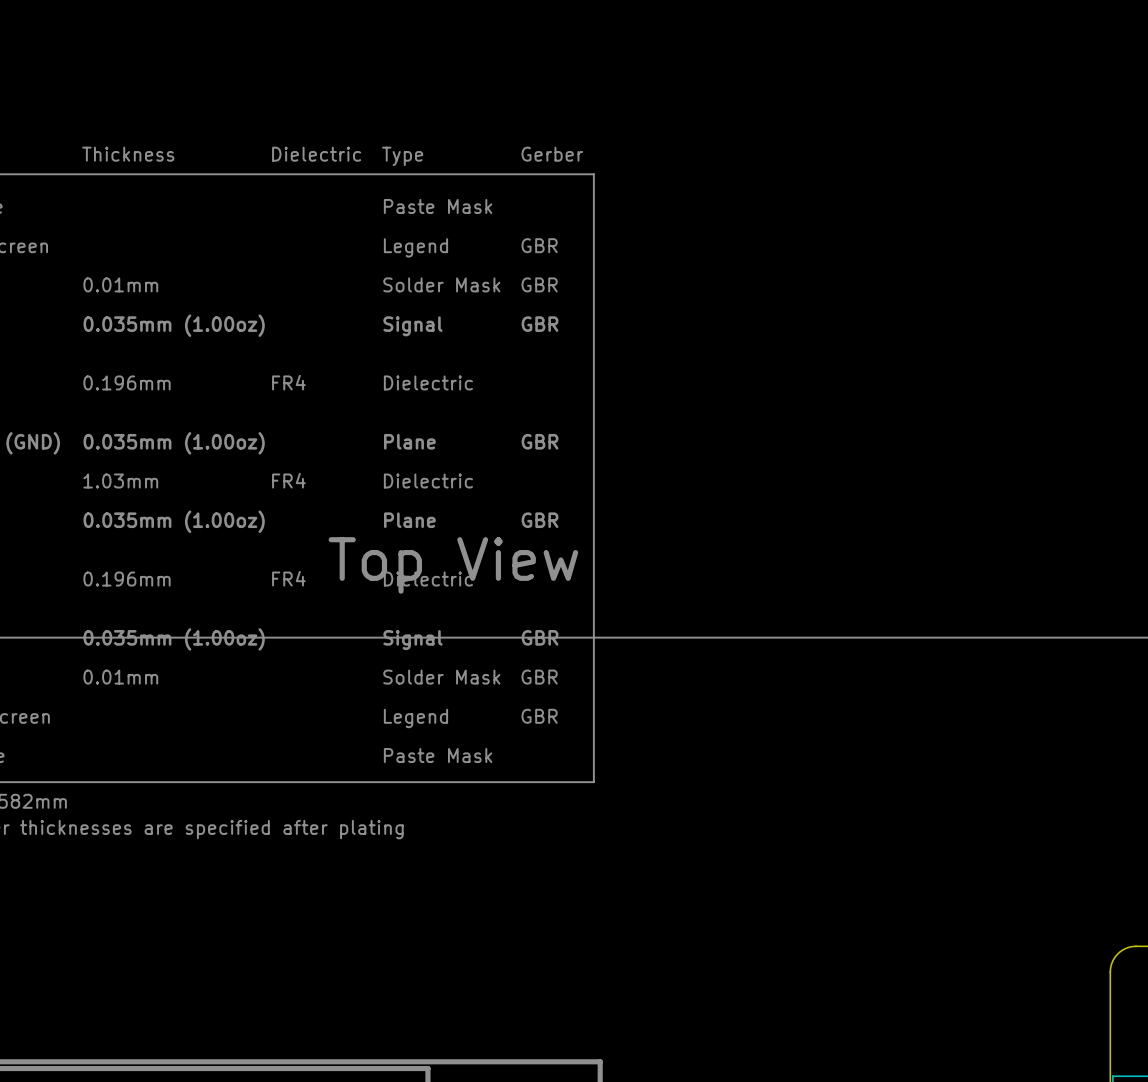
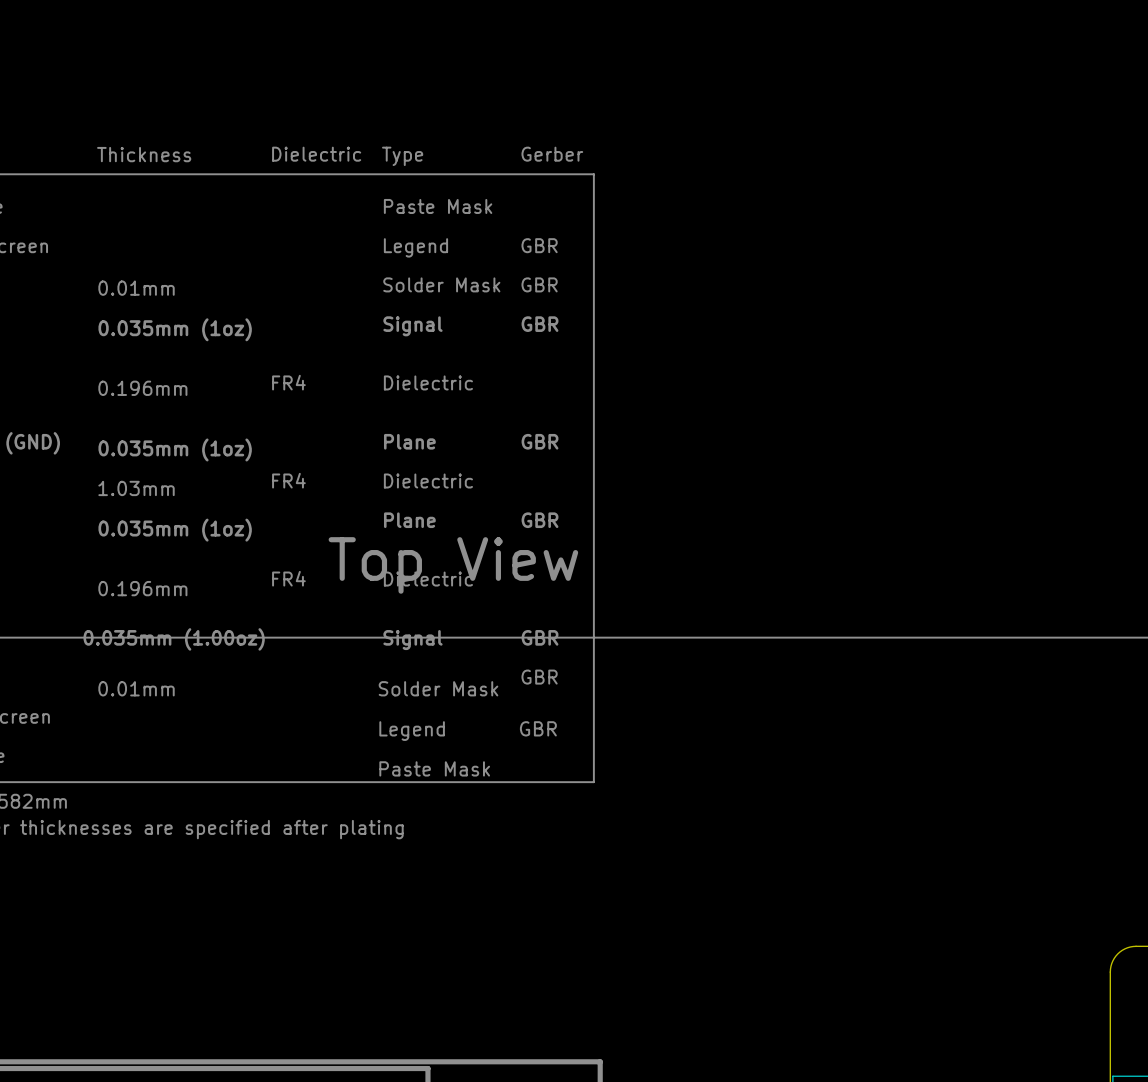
text position: Thickness (128, 154) -> Thickness (144, 154)
text position: 0.01mm (120, 284) -> 0.01mm (136, 288)
text: 0.035mm (1.00oz) (174, 325) -> 0.035mm (1oz) (175, 329)
text position: 0.196mm (127, 382) -> 0.196mm (142, 388)
text: 0.035mm (1.00oz) (174, 443) -> 0.035mm (1oz) (175, 449)
text position: 1.03mm (120, 480) -> 1.03mm (136, 488)
text: 0.035mm (1.00oz) (174, 521) -> 0.035mm (1oz) (175, 530)
text position: 0.196mm (127, 579) -> 0.196mm (142, 588)
text position: 0.01mm (120, 677) -> 0.01mm (136, 688)
text position: Solder Mask (441, 677) -> Solder Mask (438, 688)
text position: GBR (539, 716) -> GBR (538, 728)
text position: Legend (415, 718) -> Legend (412, 731)
text position: Paste Mask (438, 755) -> Paste Mask (434, 768)

